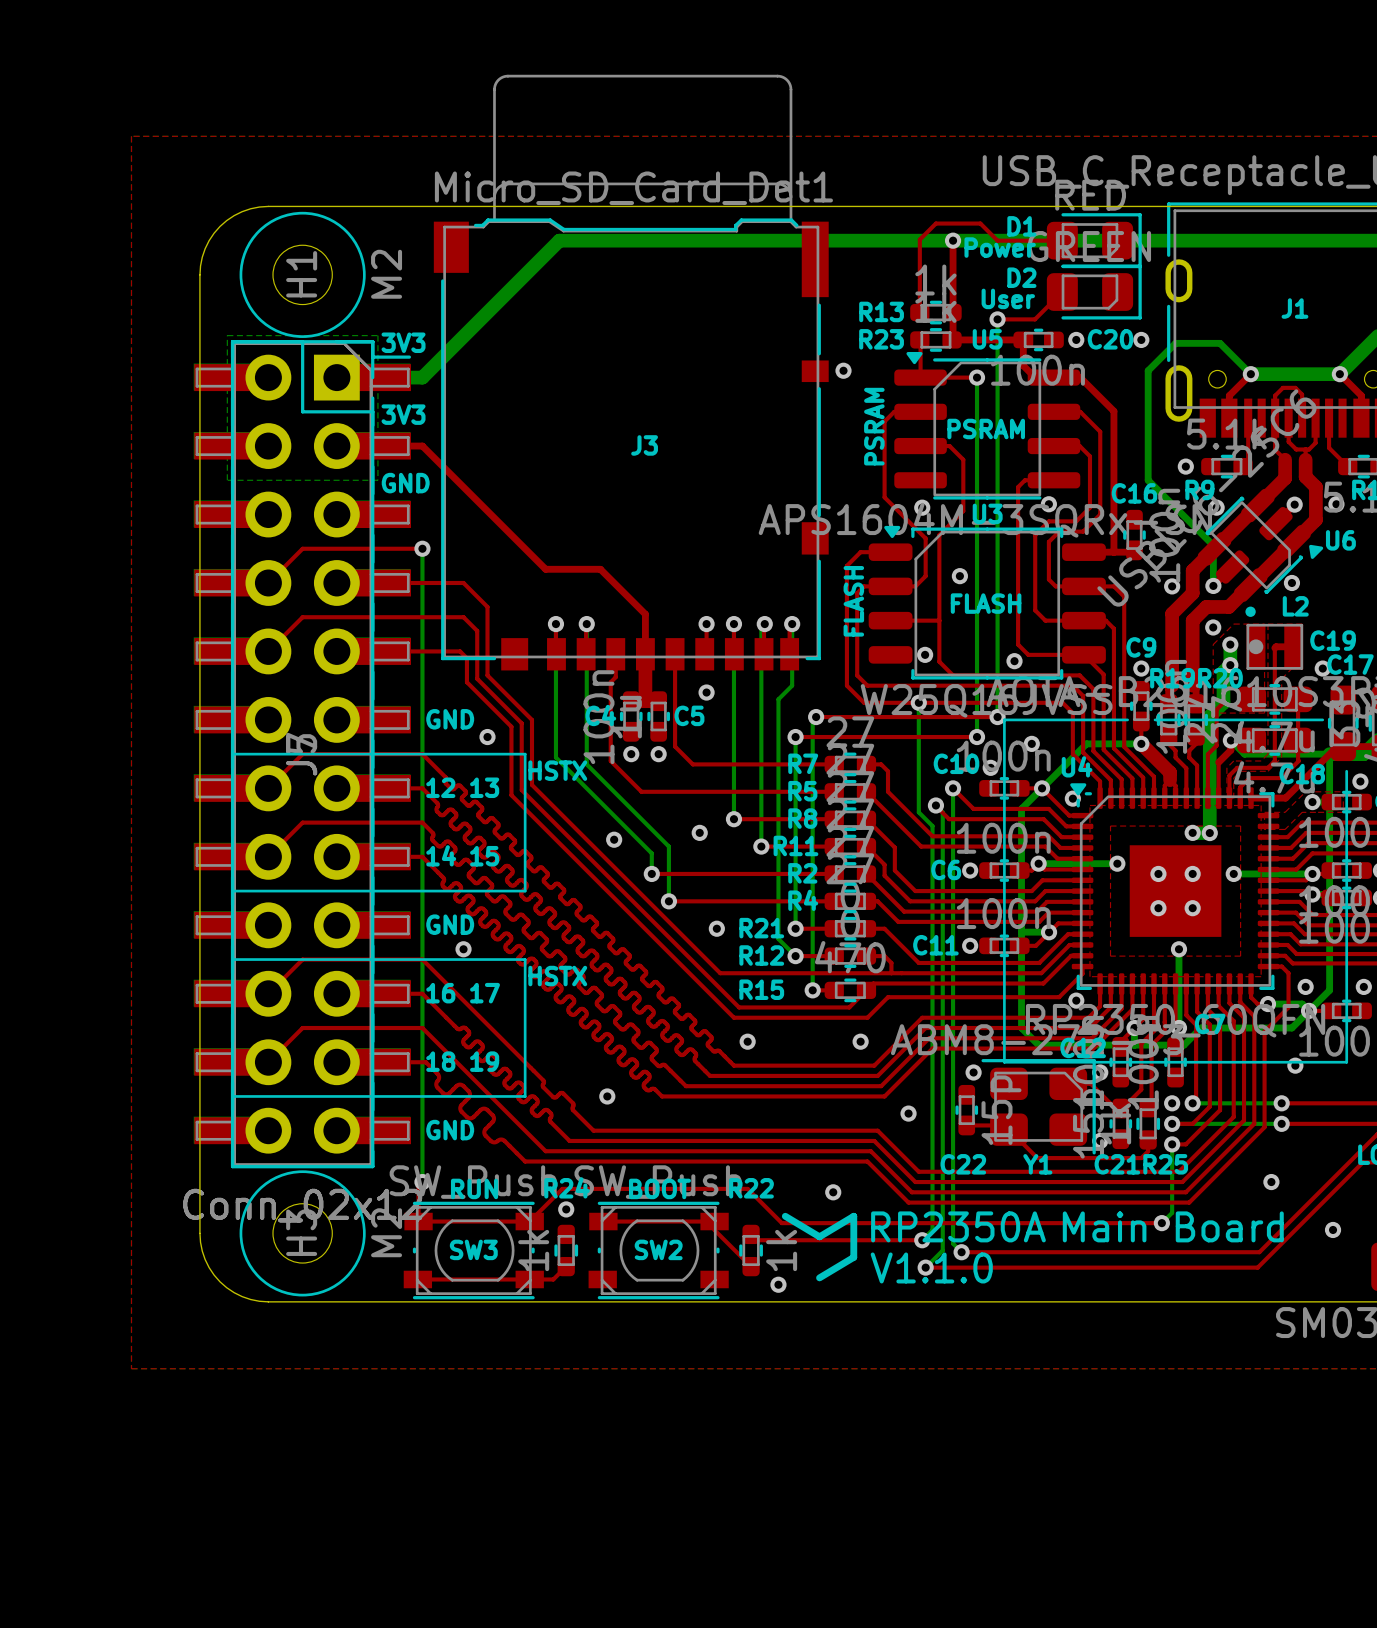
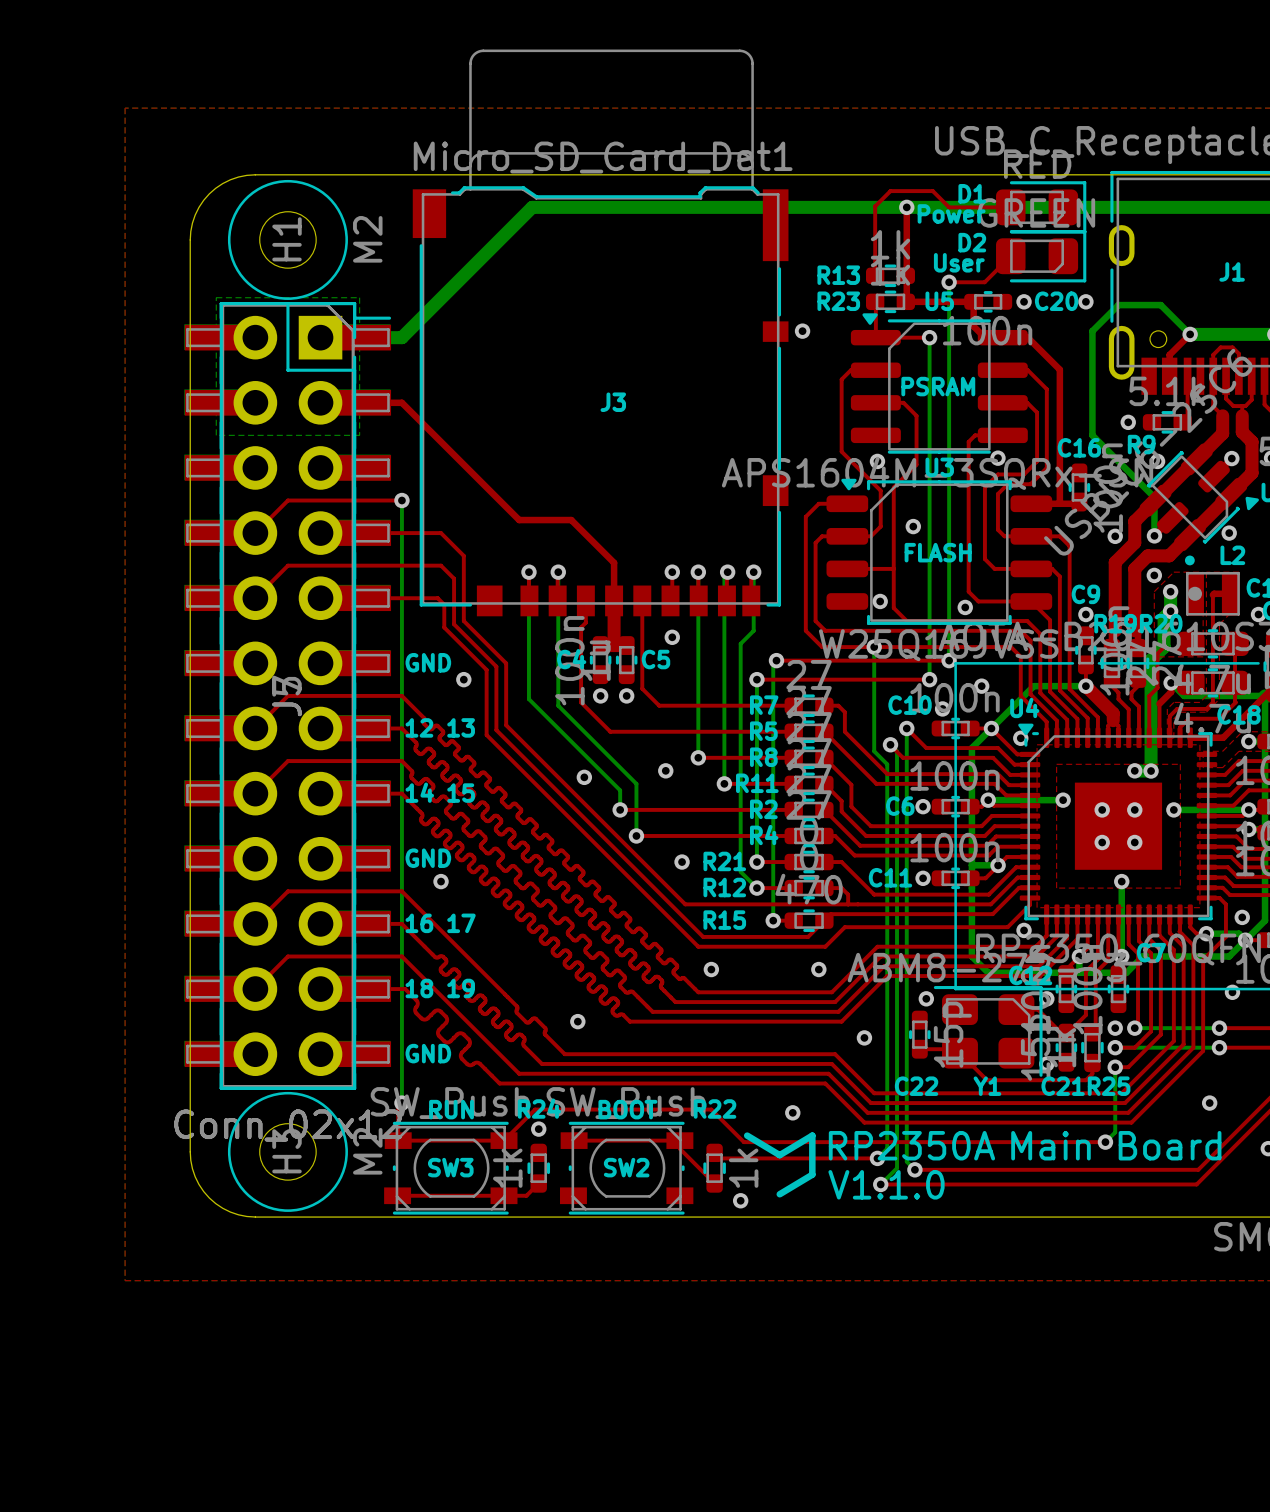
text: 3V3 (403, 342) -> none
text: 3V3 (403, 414) -> none
text: PSRAM (874, 426) -> none
text: GND (405, 483) -> none
text: FLASH (853, 601) -> none
line: (232, 754) (525, 754) (525, 891) (232, 891) (232, 754) -> none
text: HSTX (557, 770) -> none
line: (232, 959) (232, 1096) (525, 1096) (525, 959) (232, 959) -> none
text: HSTX (557, 976) -> none

